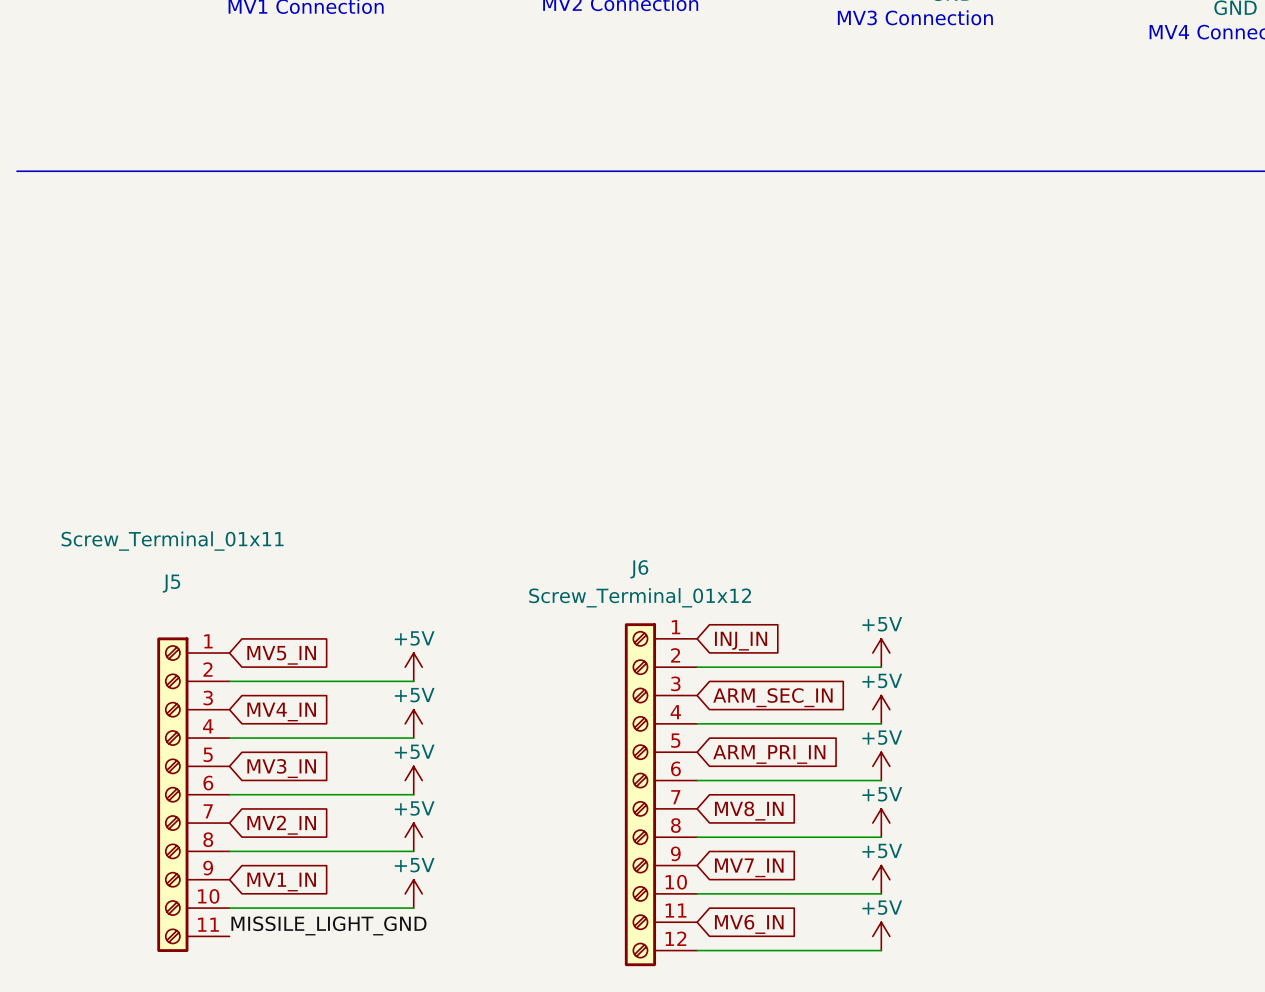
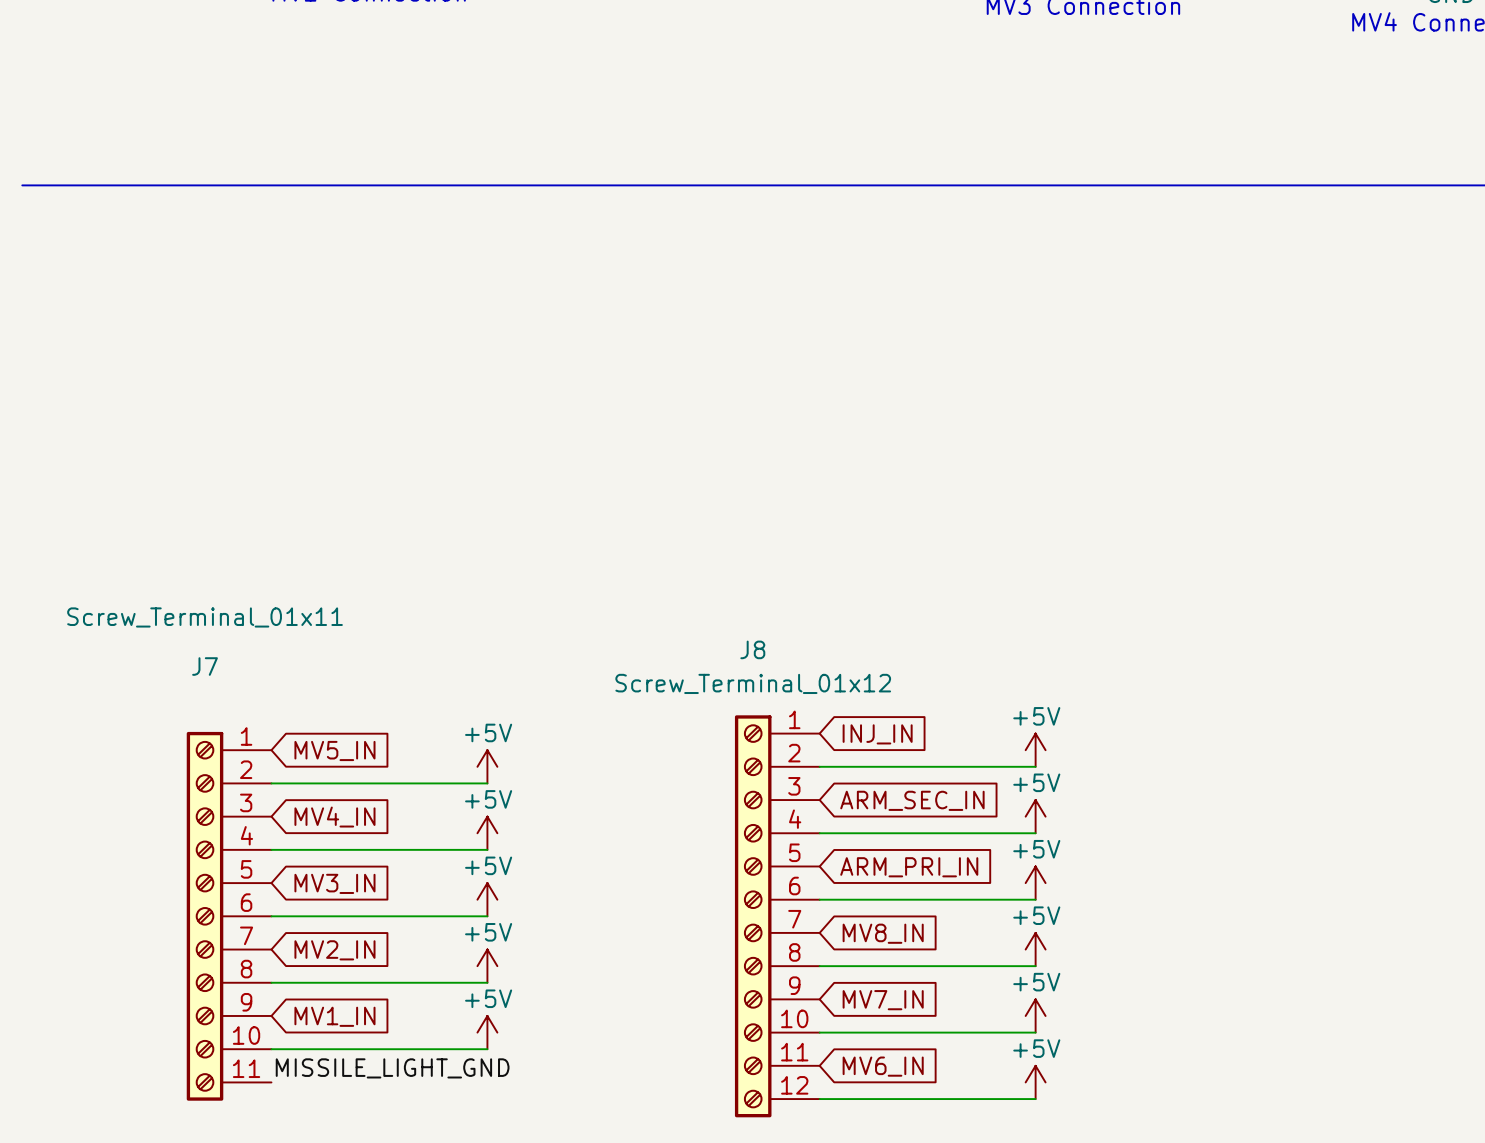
J6 name: J6 (639, 569) -> J8 (752, 649)
J5 name: J5 (171, 583) -> J7 (205, 666)

